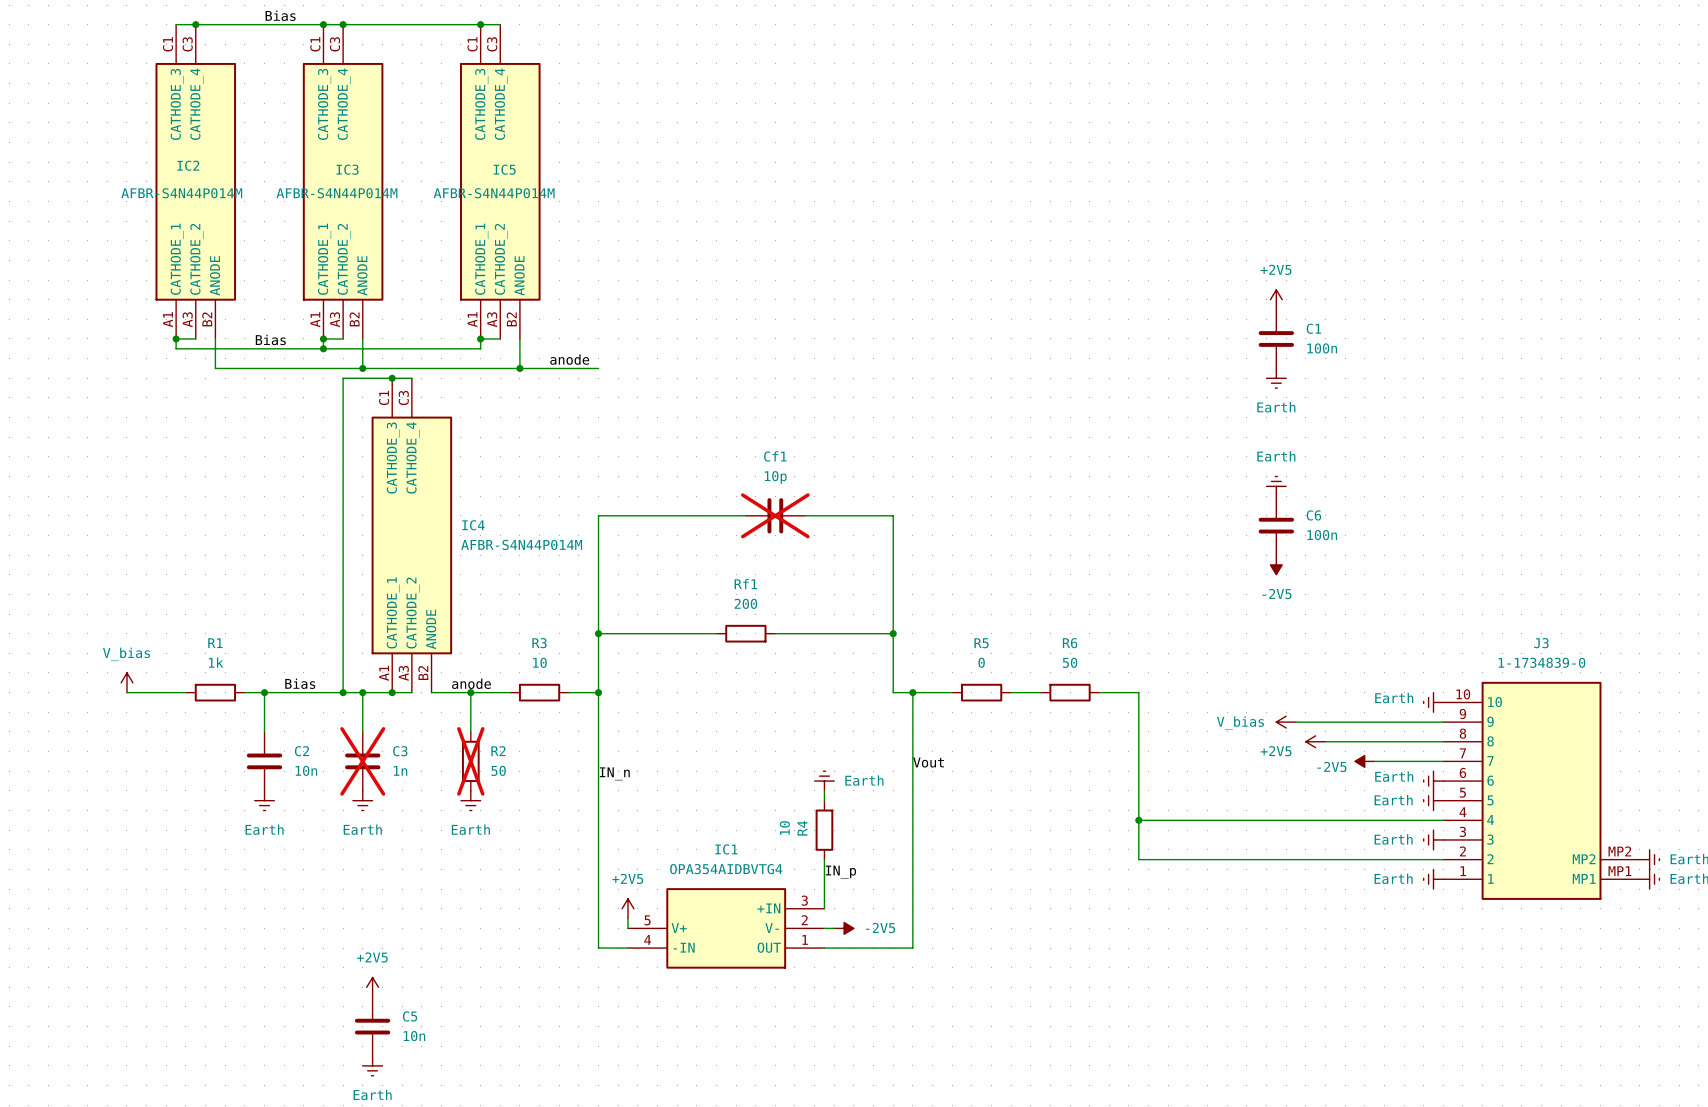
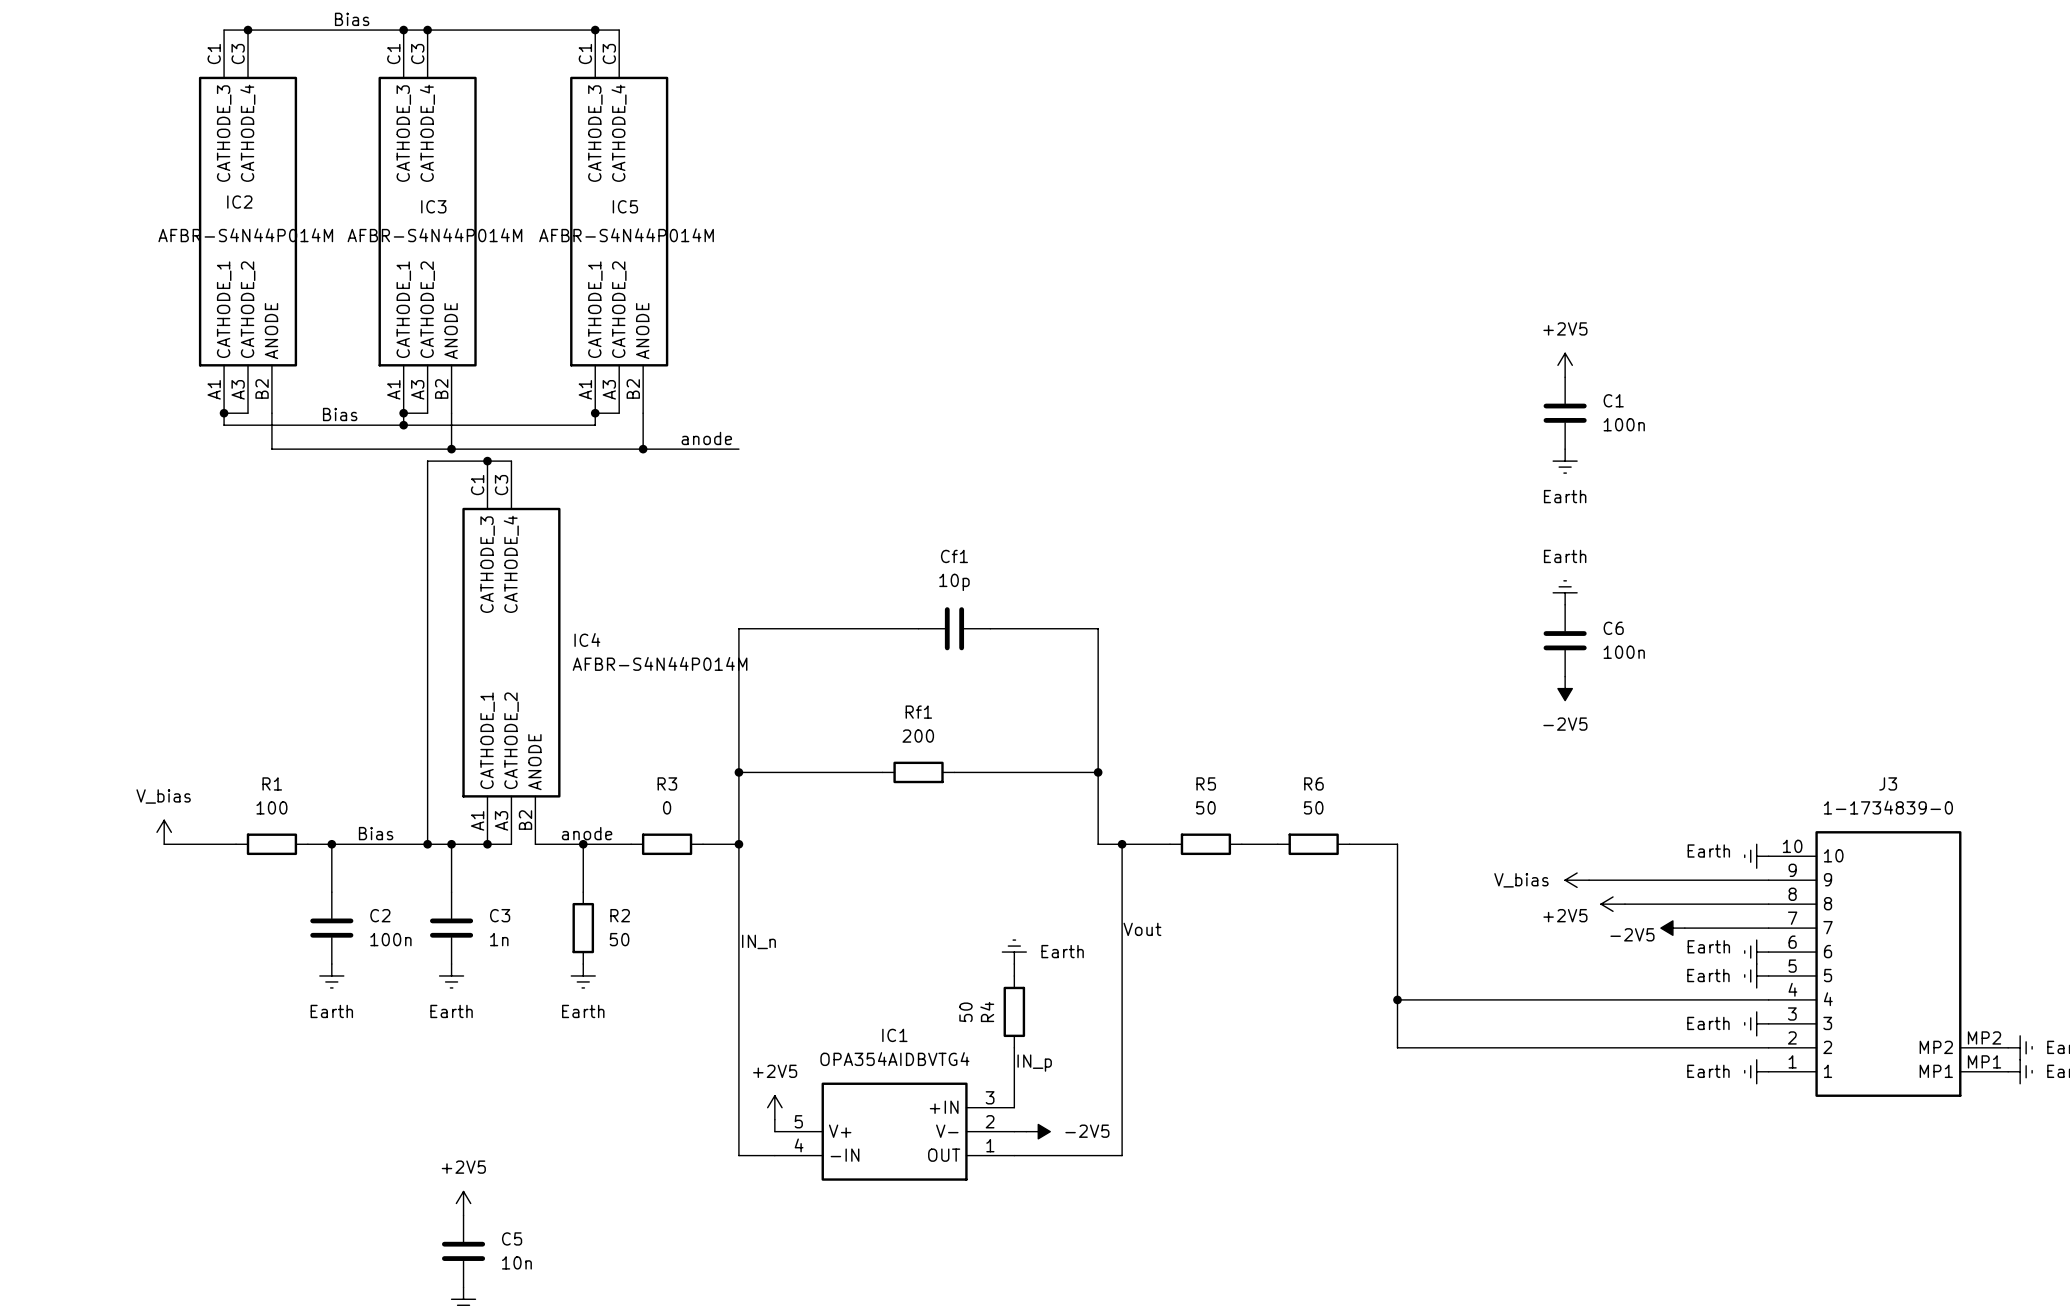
Cf1 do-not-place cross: (775, 515) -> none
R1 value: 1k (216, 662) -> 100 (271, 807)
R3 value: 10 (539, 662) -> 0 (667, 807)
R5 value: 0 (981, 662) -> 50 (1205, 807)
C3 do-not-place cross: (362, 761) -> none
R2 do-not-place cross: (470, 761) -> none
C2 value: 10n (306, 770) -> 100n (390, 939)
R4 value: 10 (784, 828) -> 50 (965, 1012)

